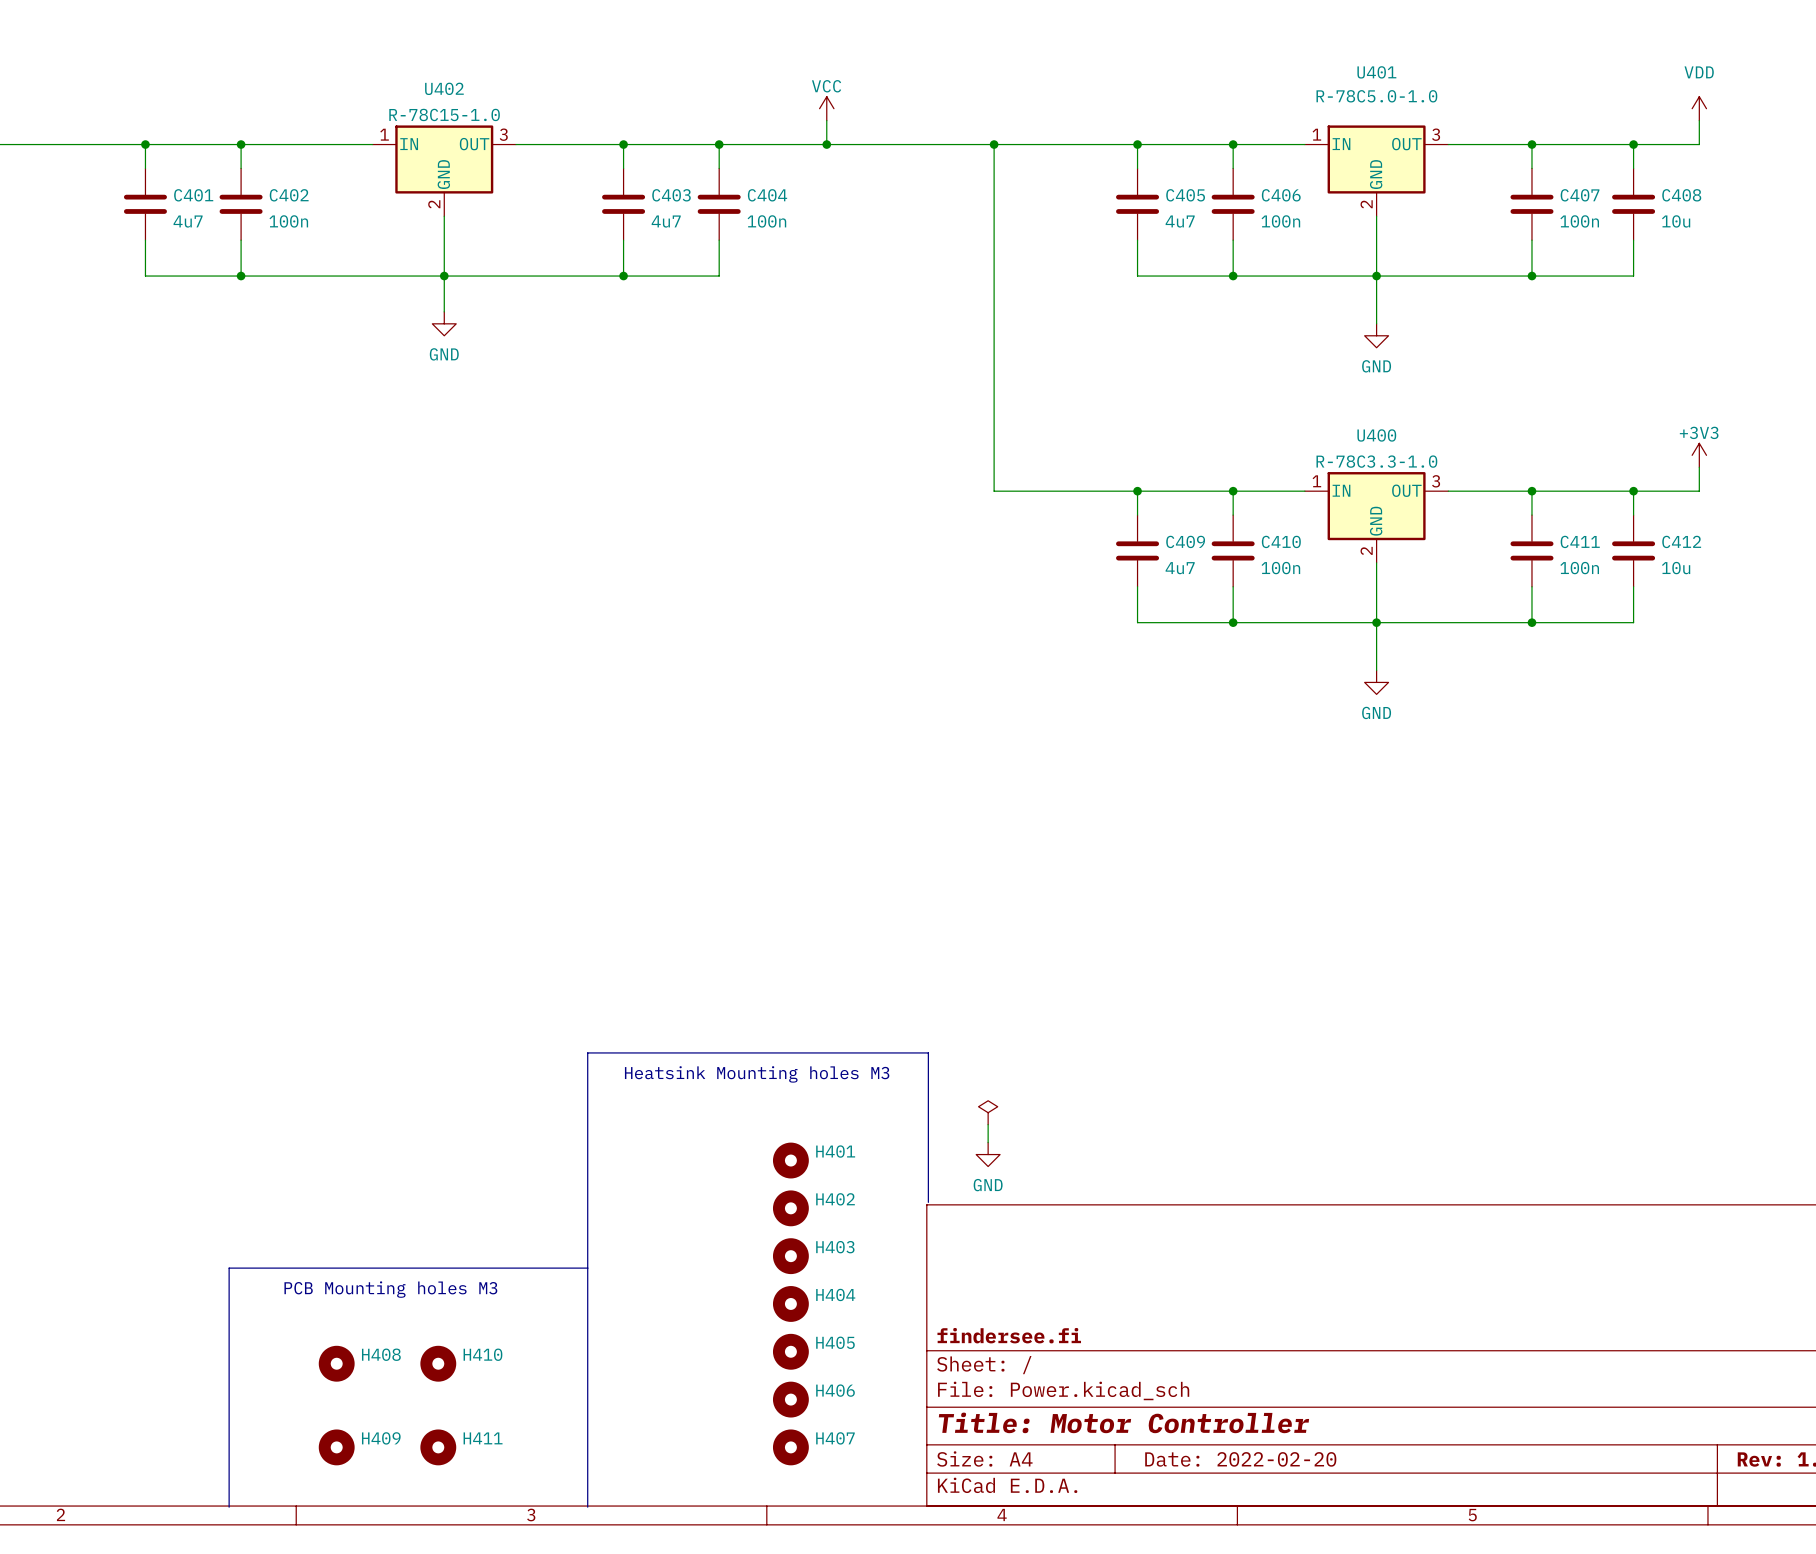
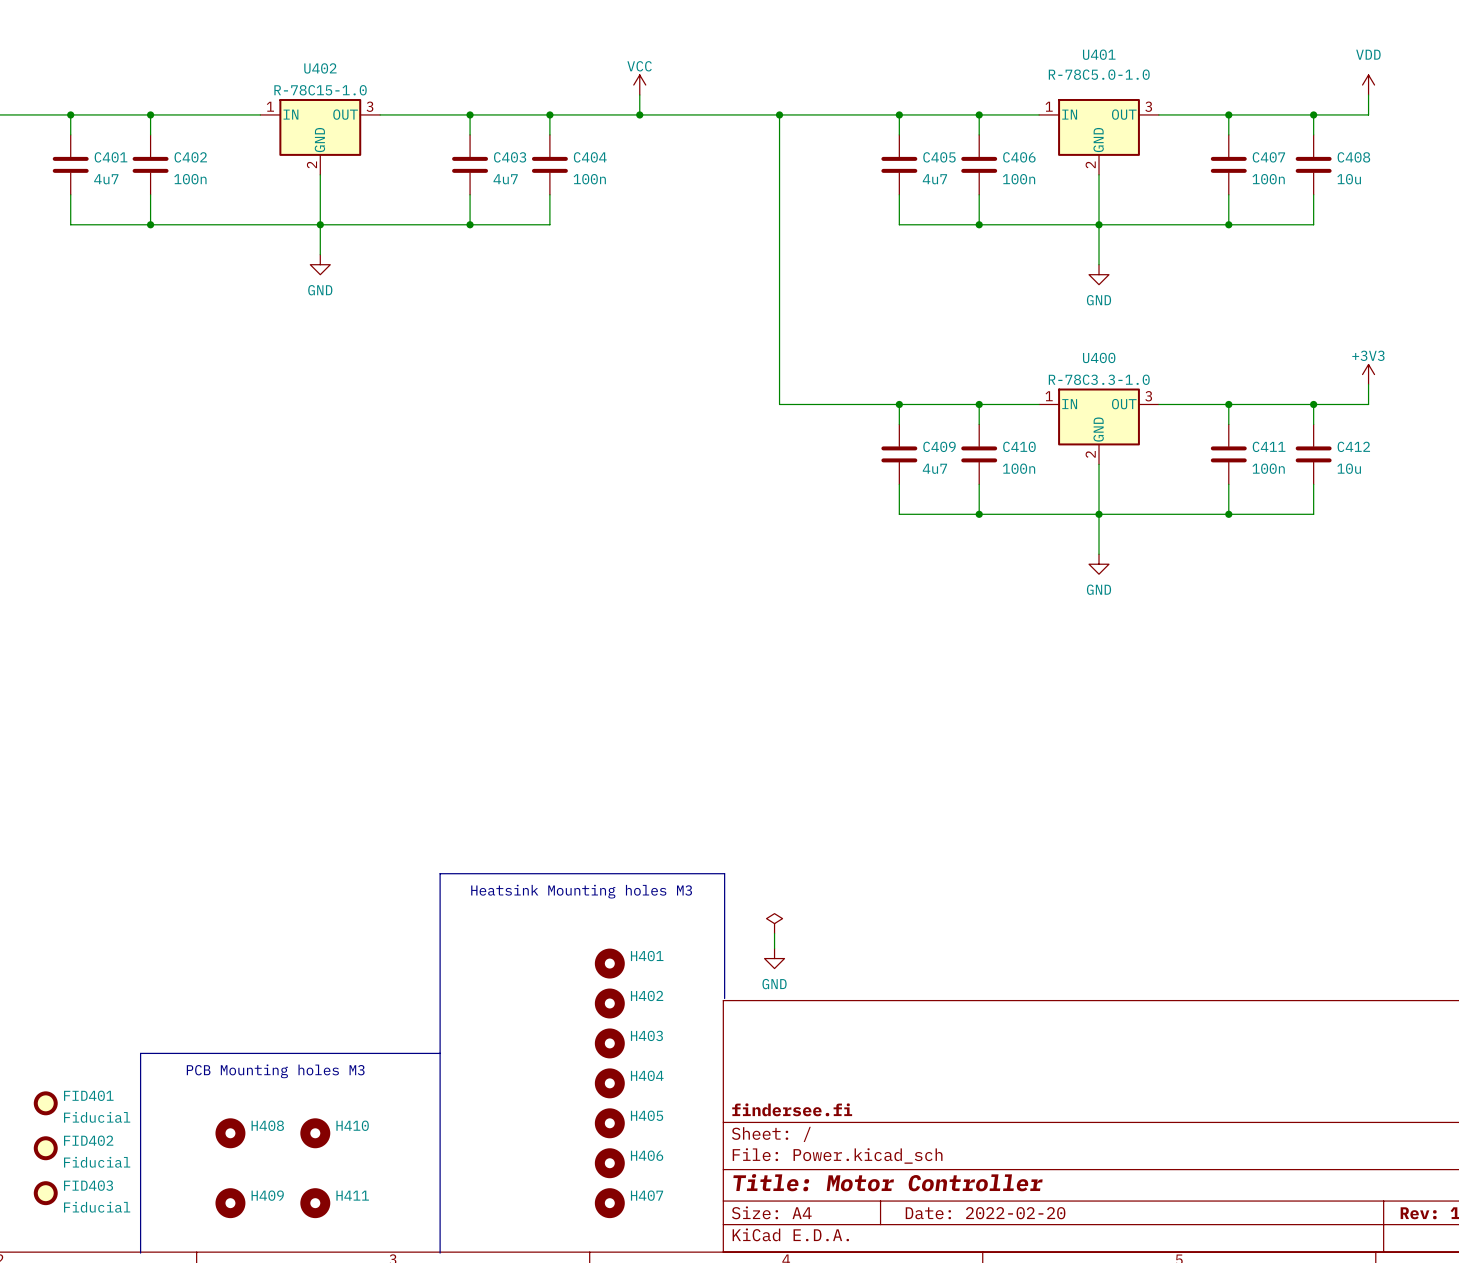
FID401: none -> Fiducial (45, 1103)
FID402: none -> Fiducial (45, 1148)
FID403: none -> Fiducial (45, 1193)

